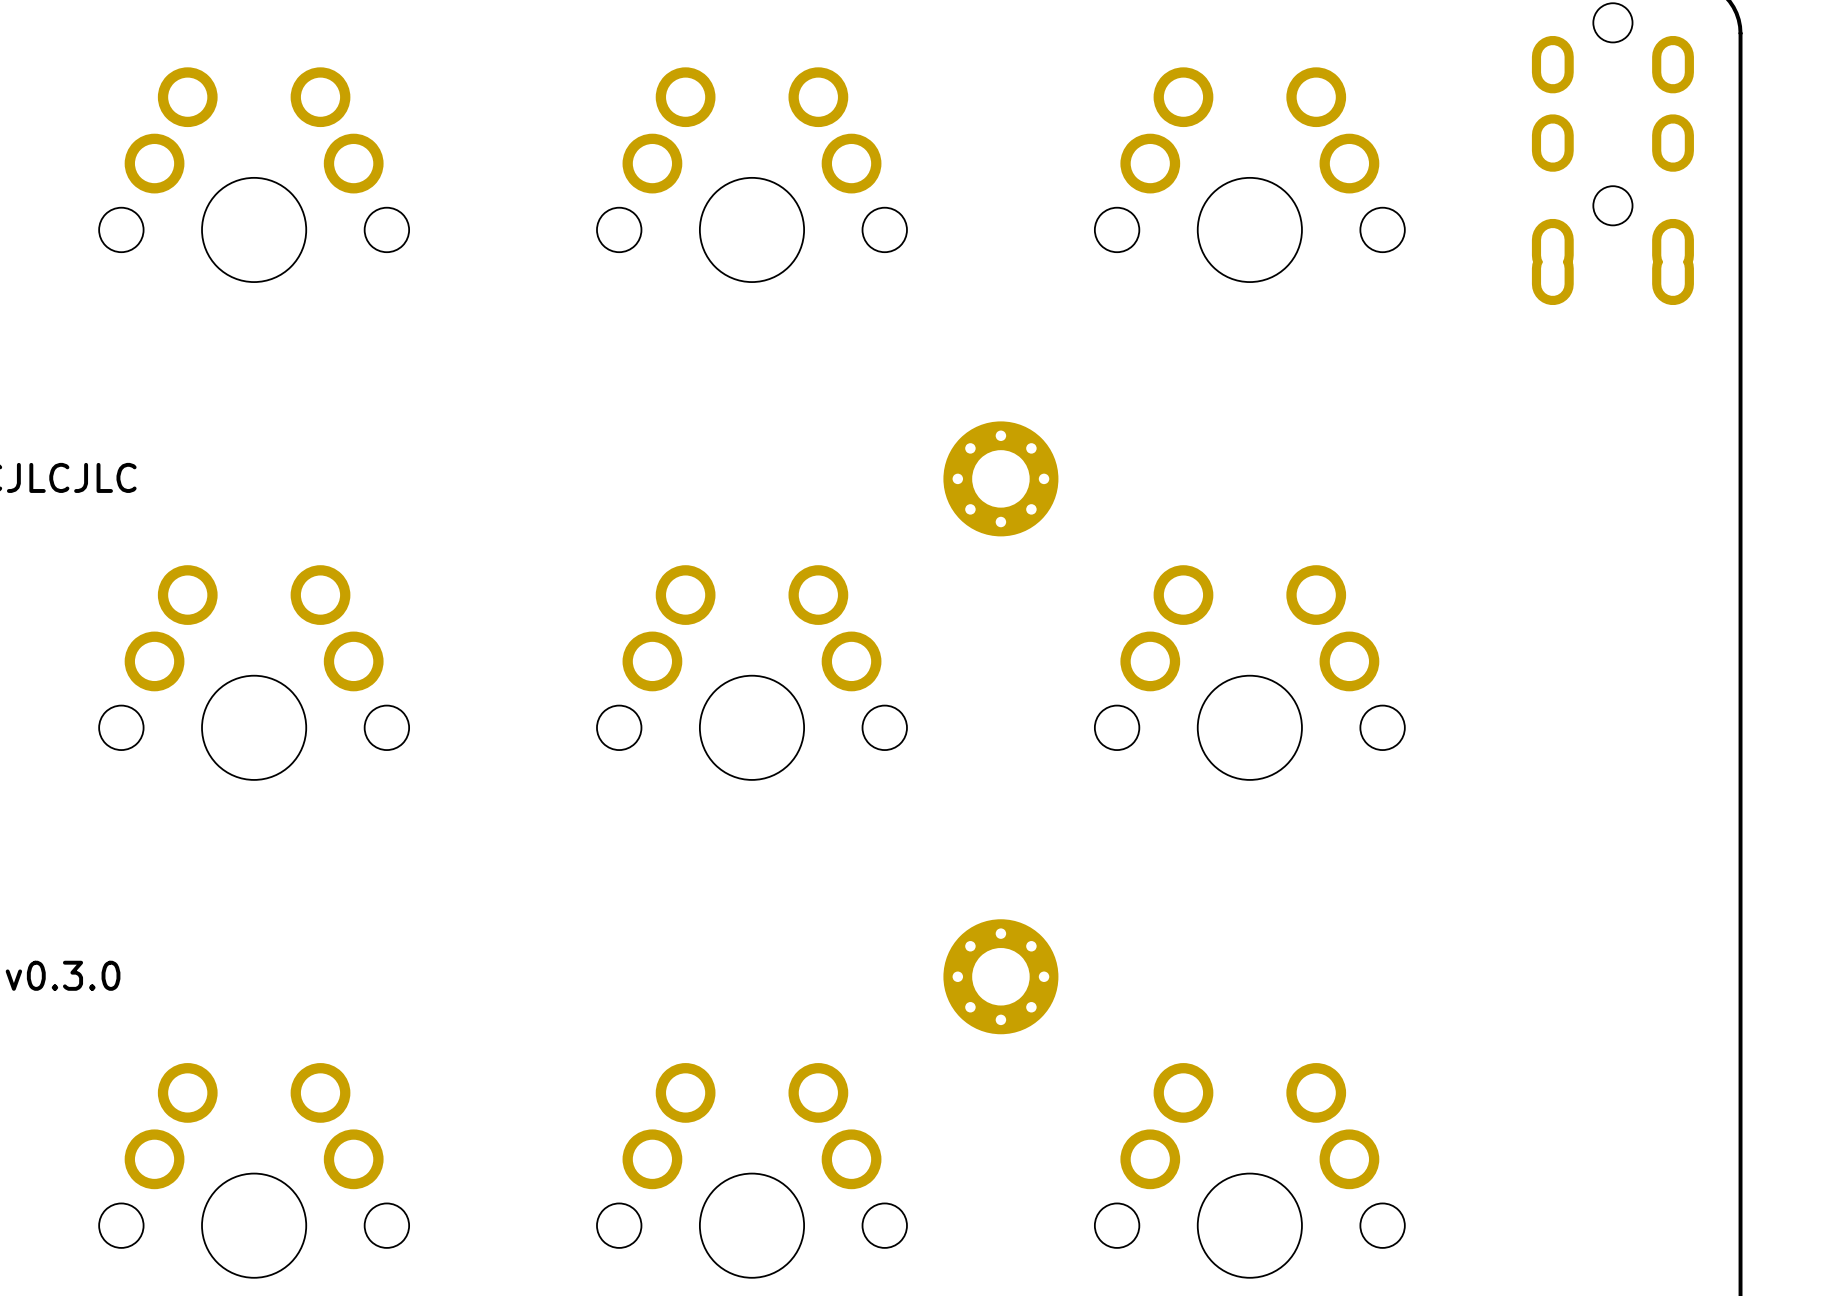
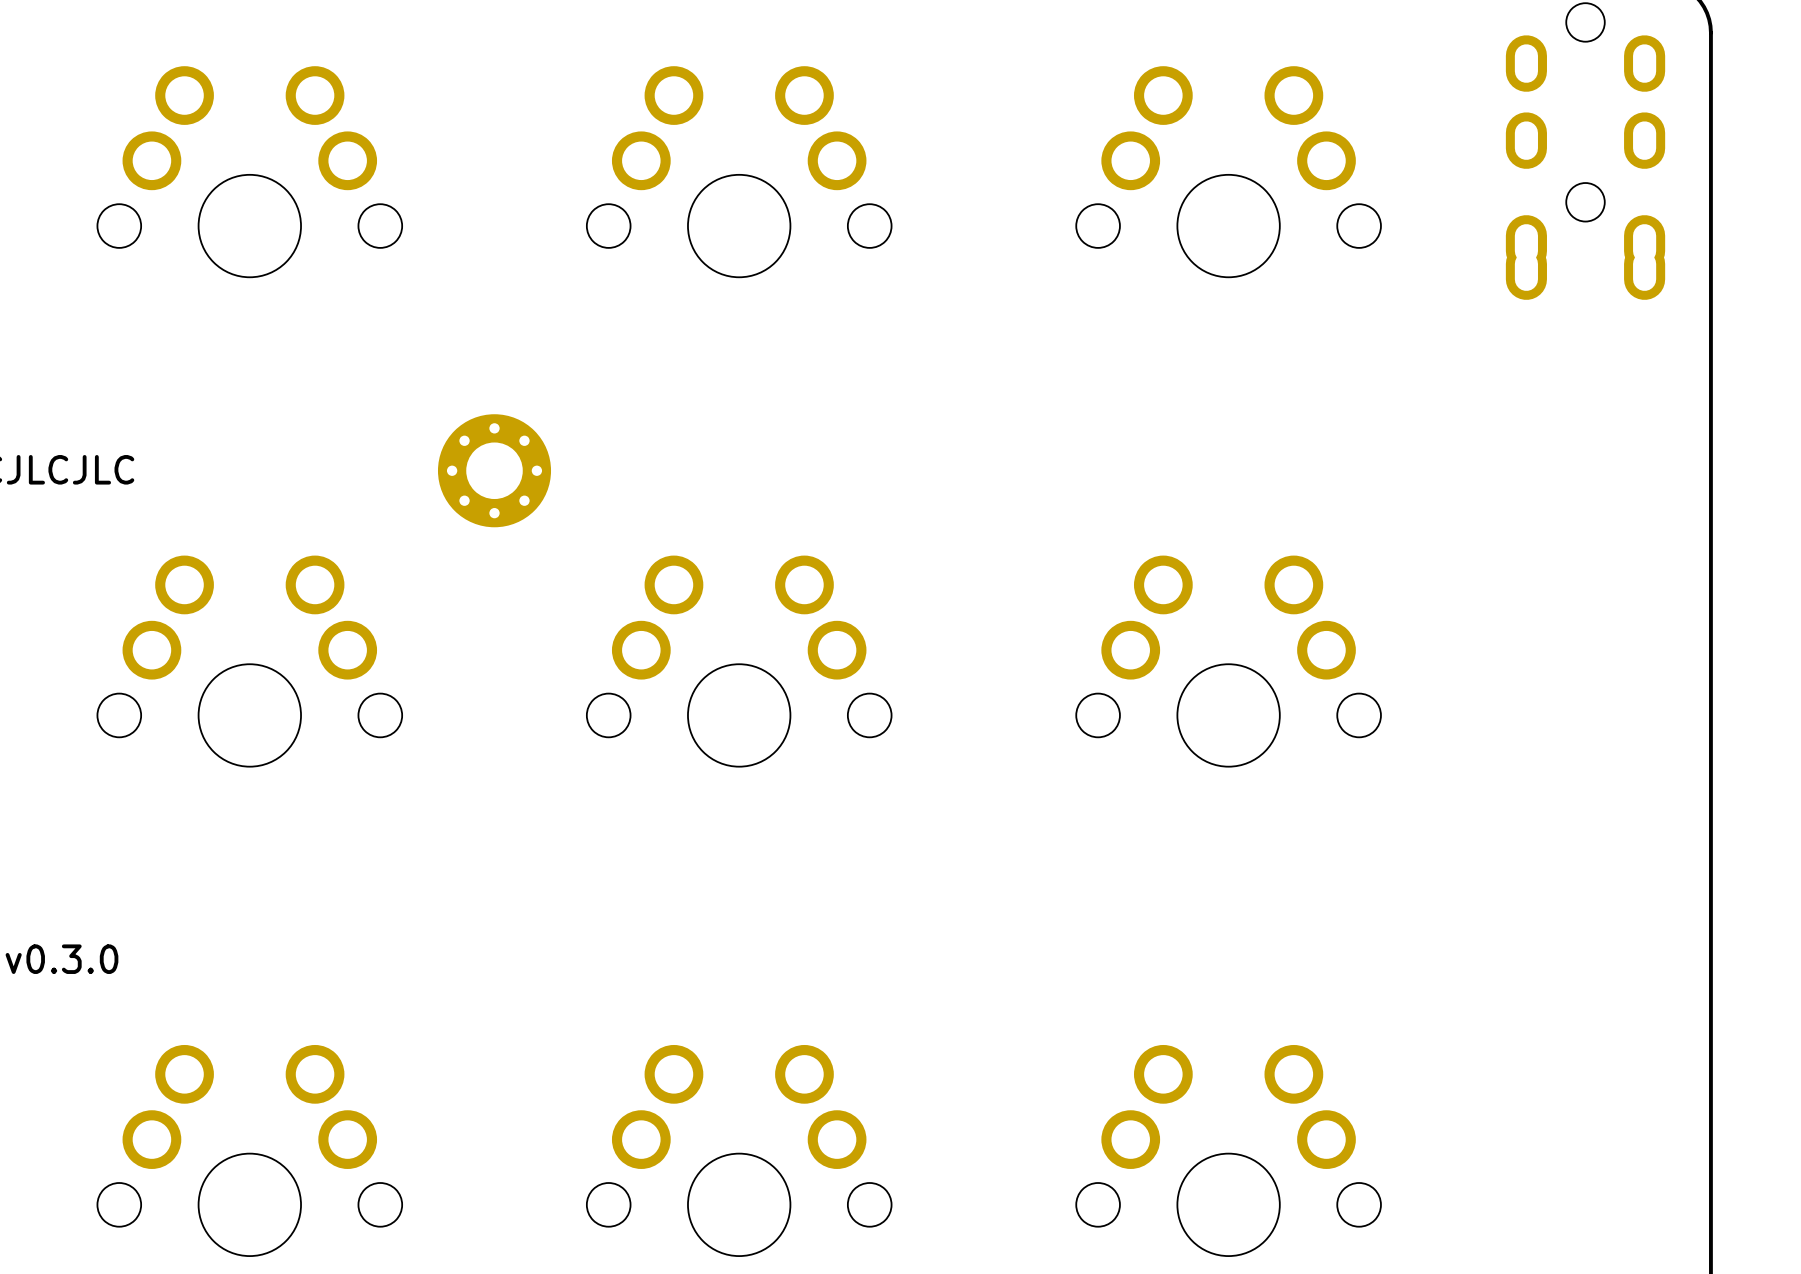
part: none -> (494, 470)
part: (1000, 478) -> none
part: (1000, 976) -> none

